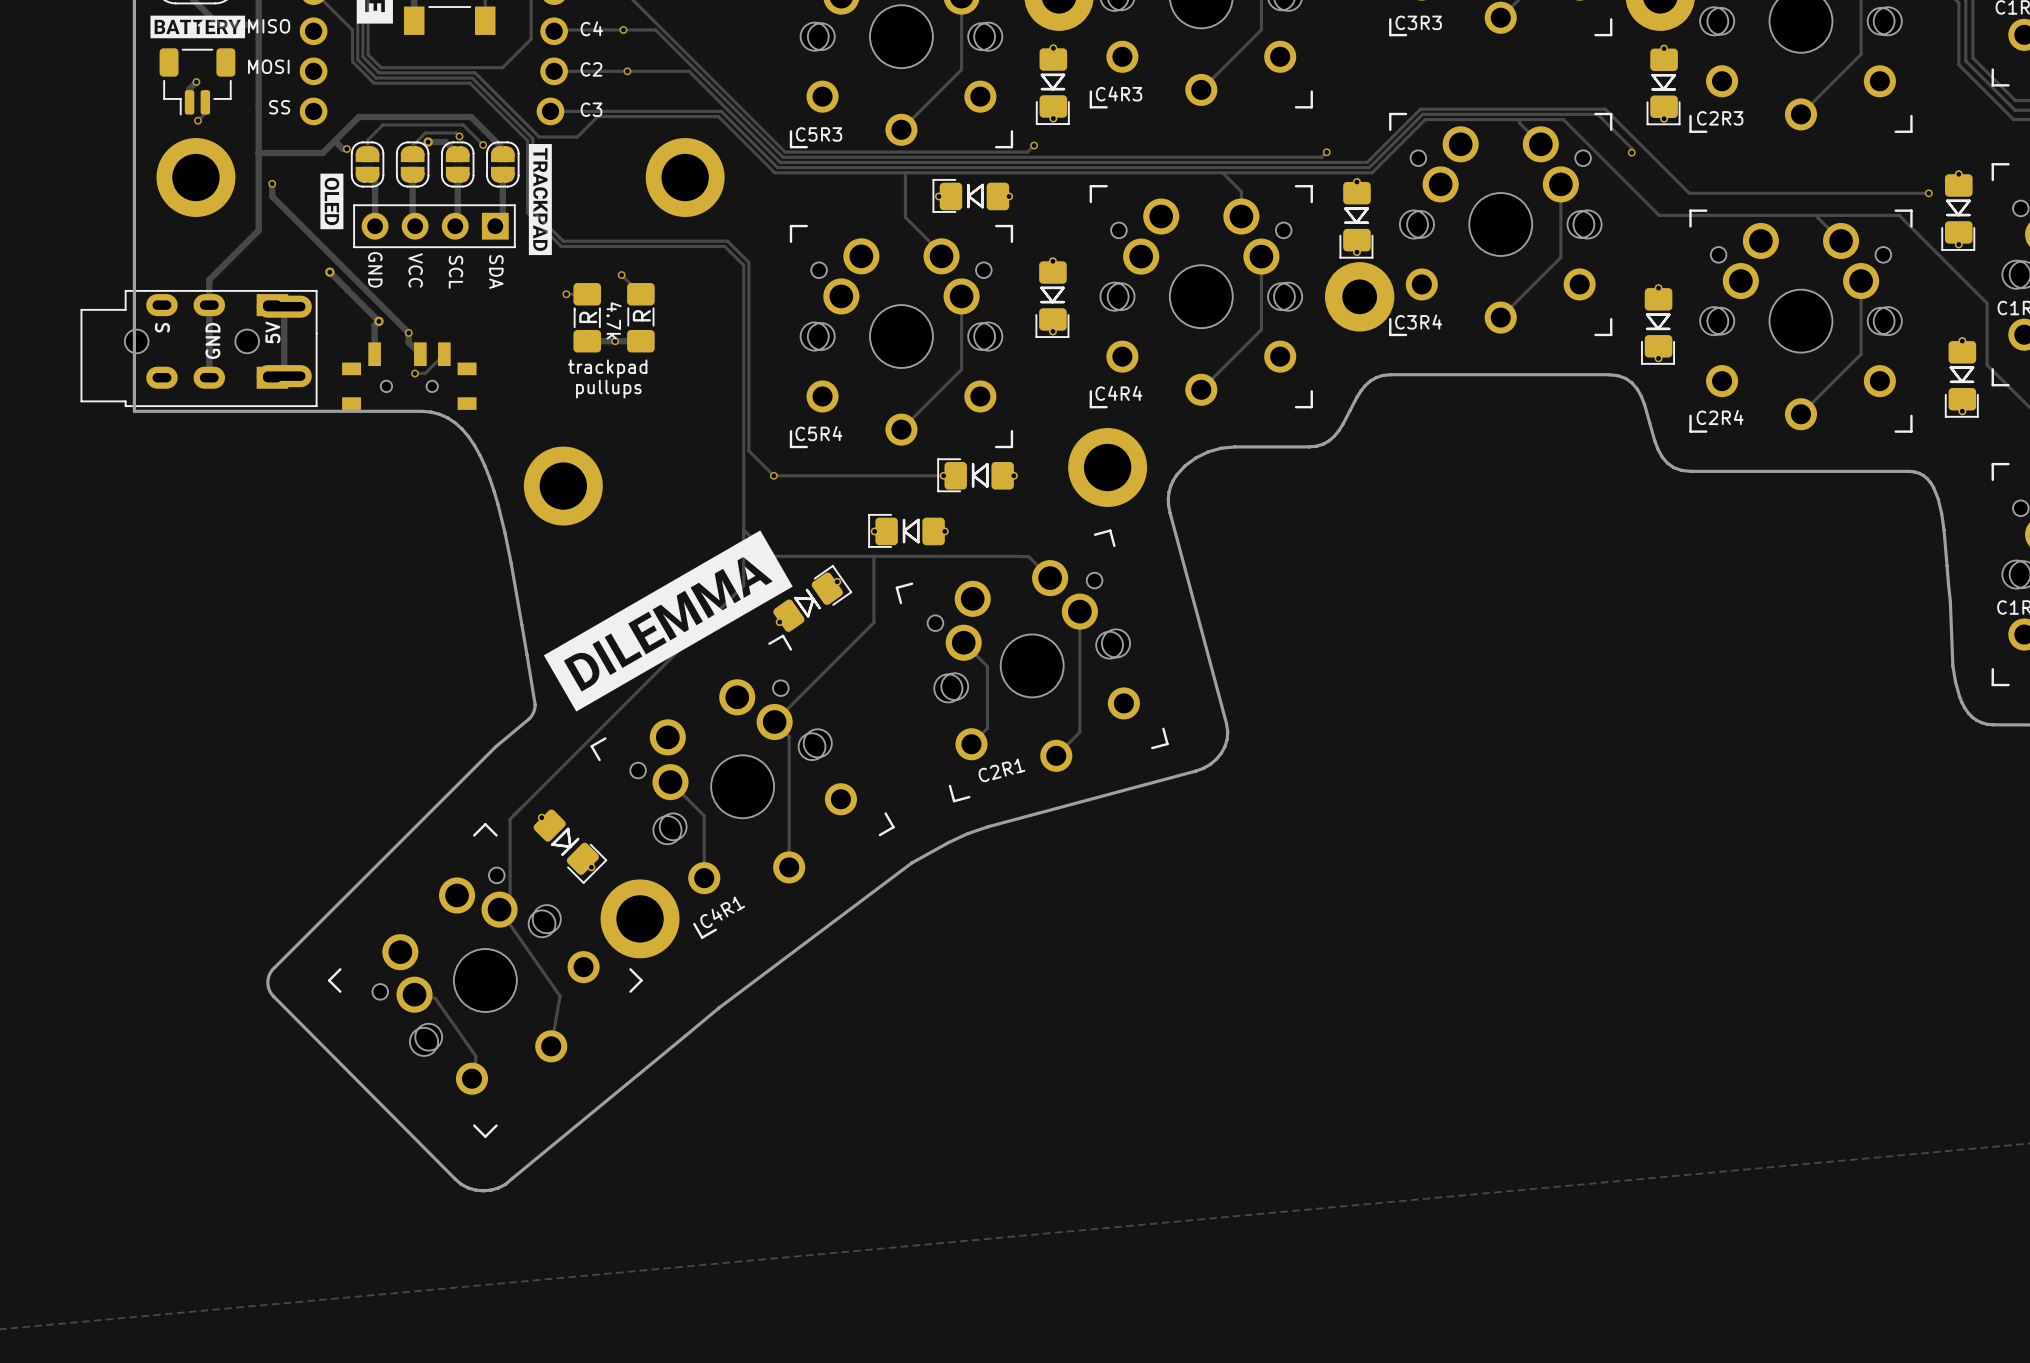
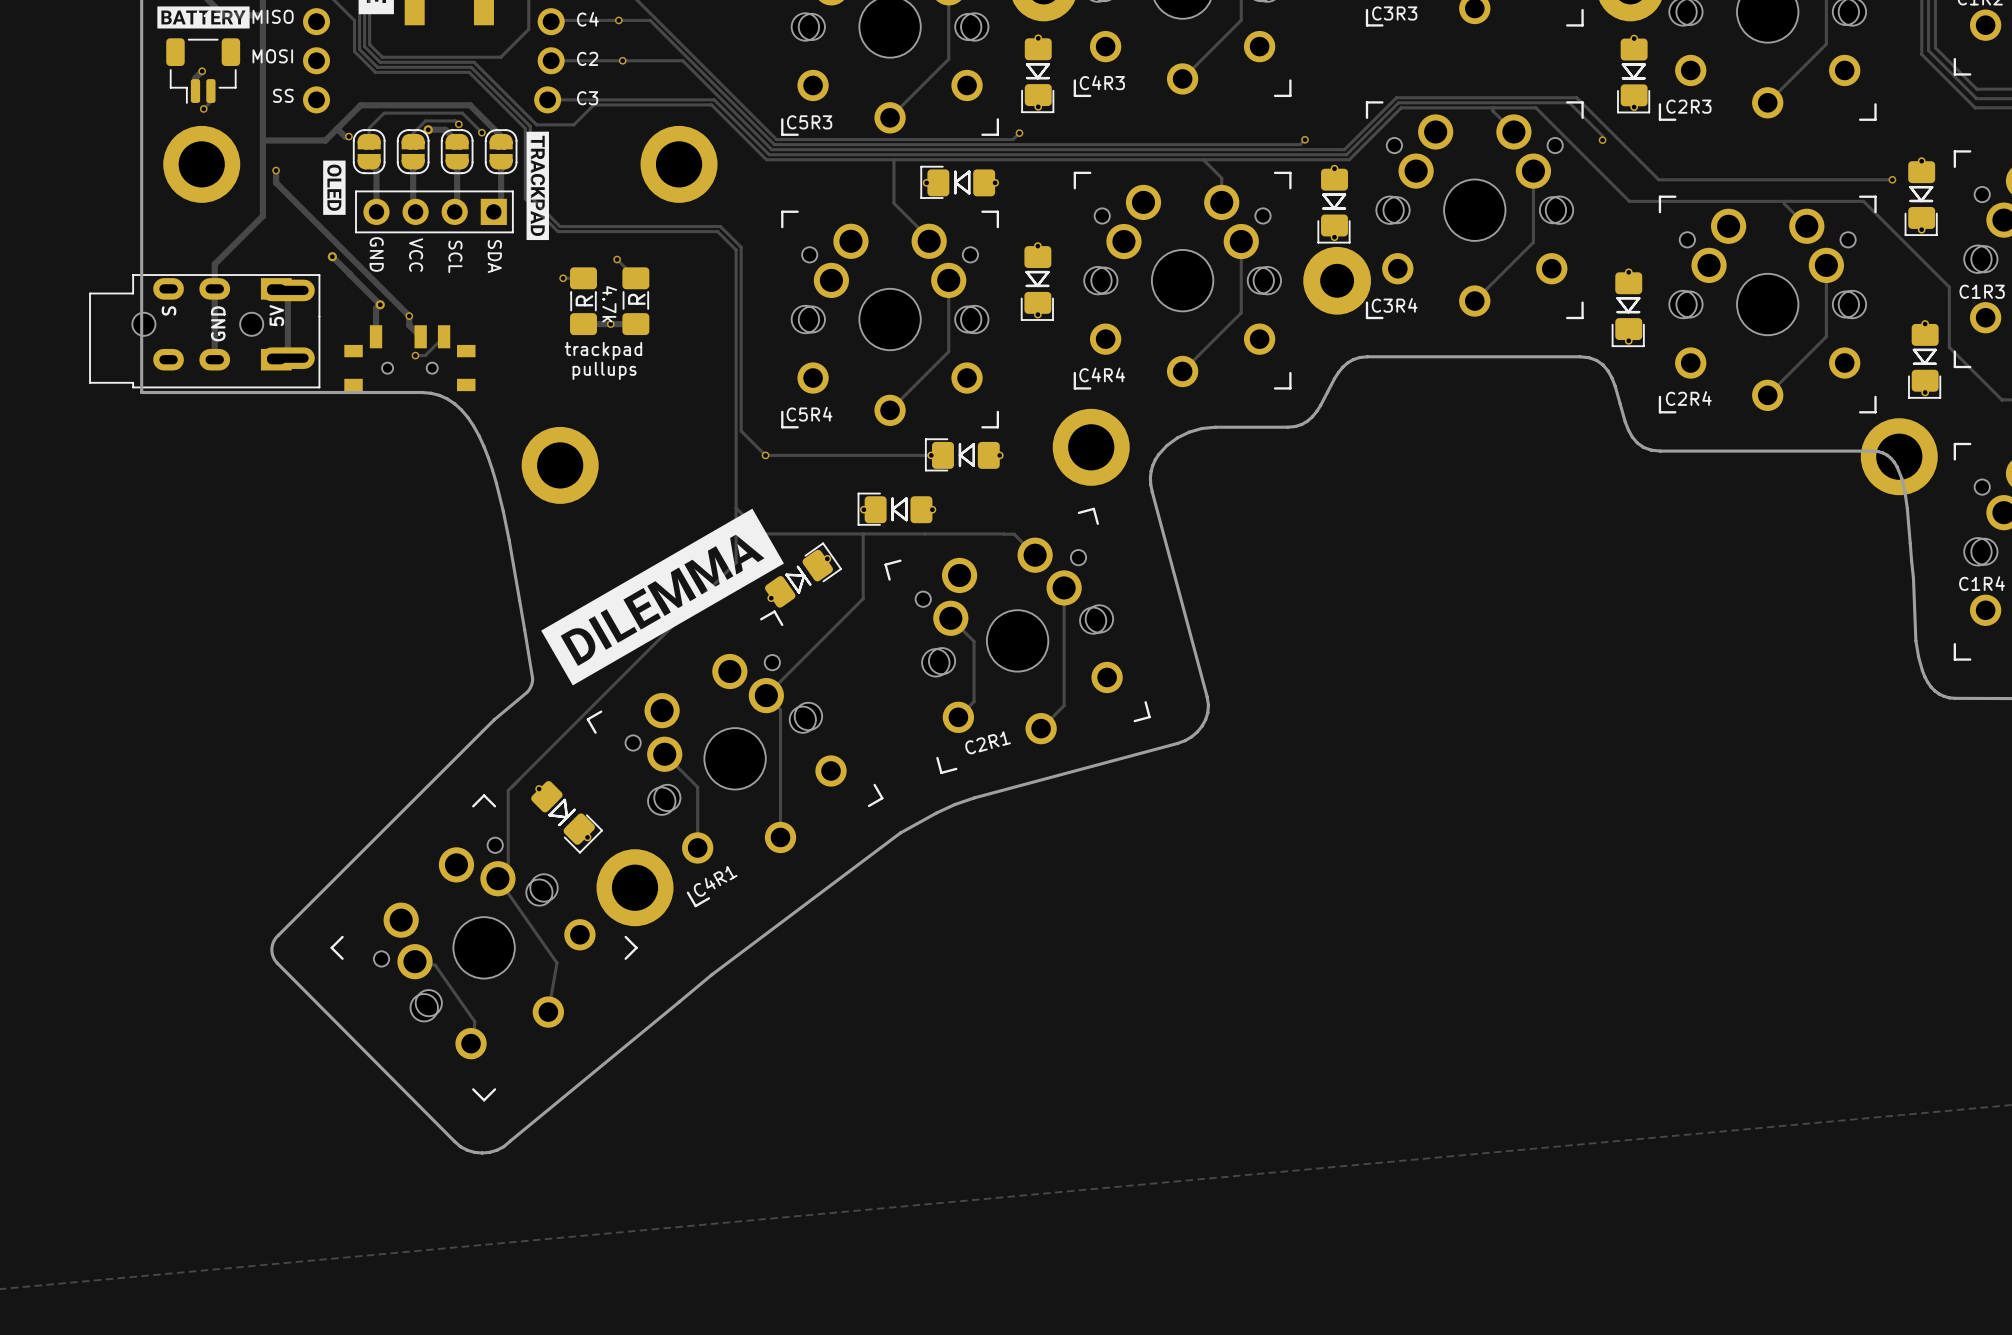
part: none -> (1899, 456)

